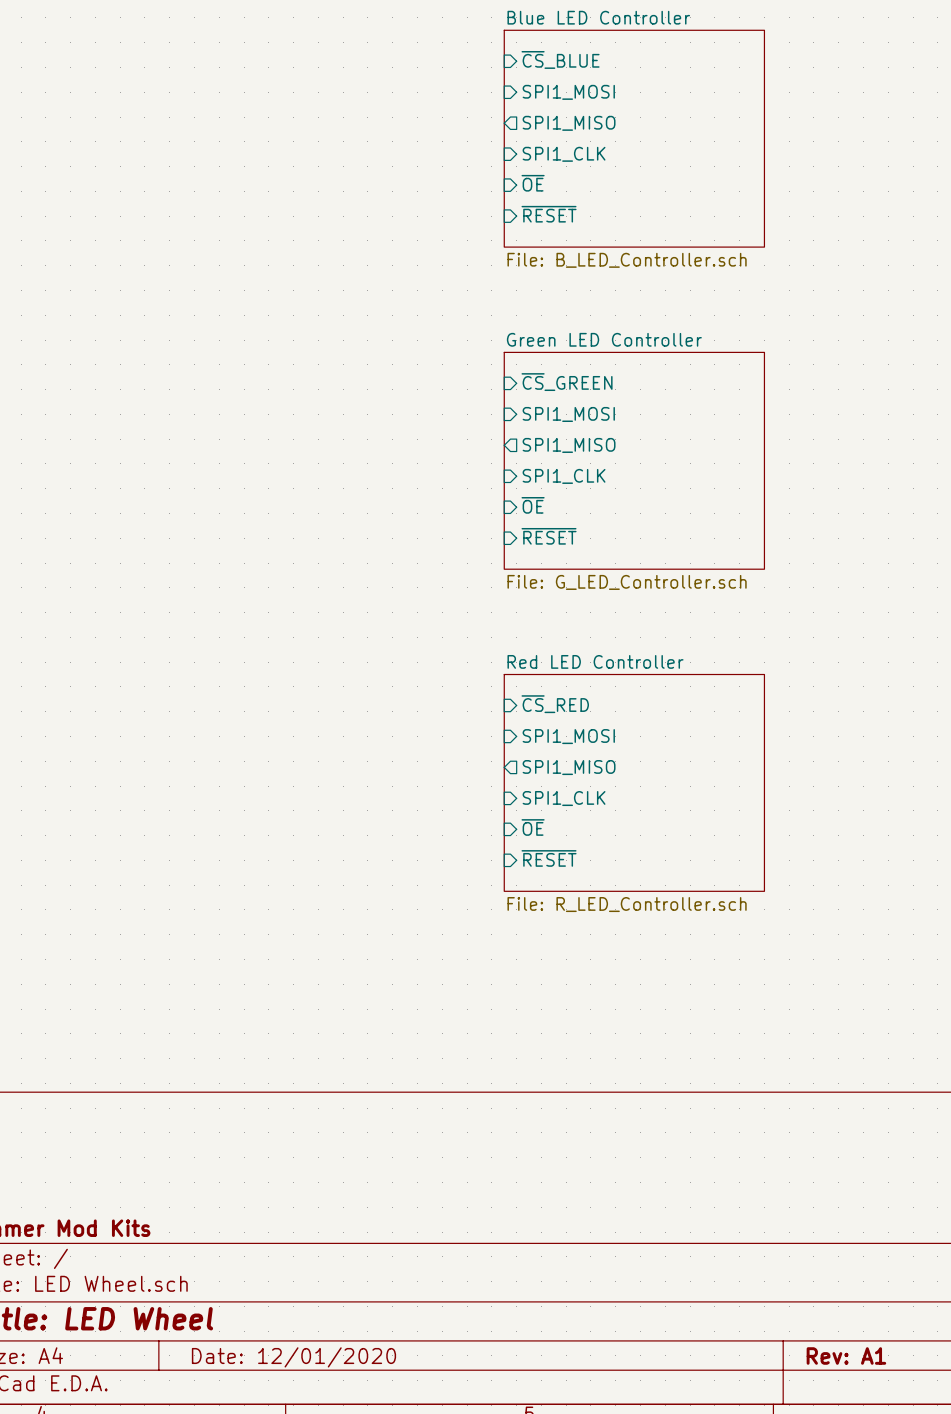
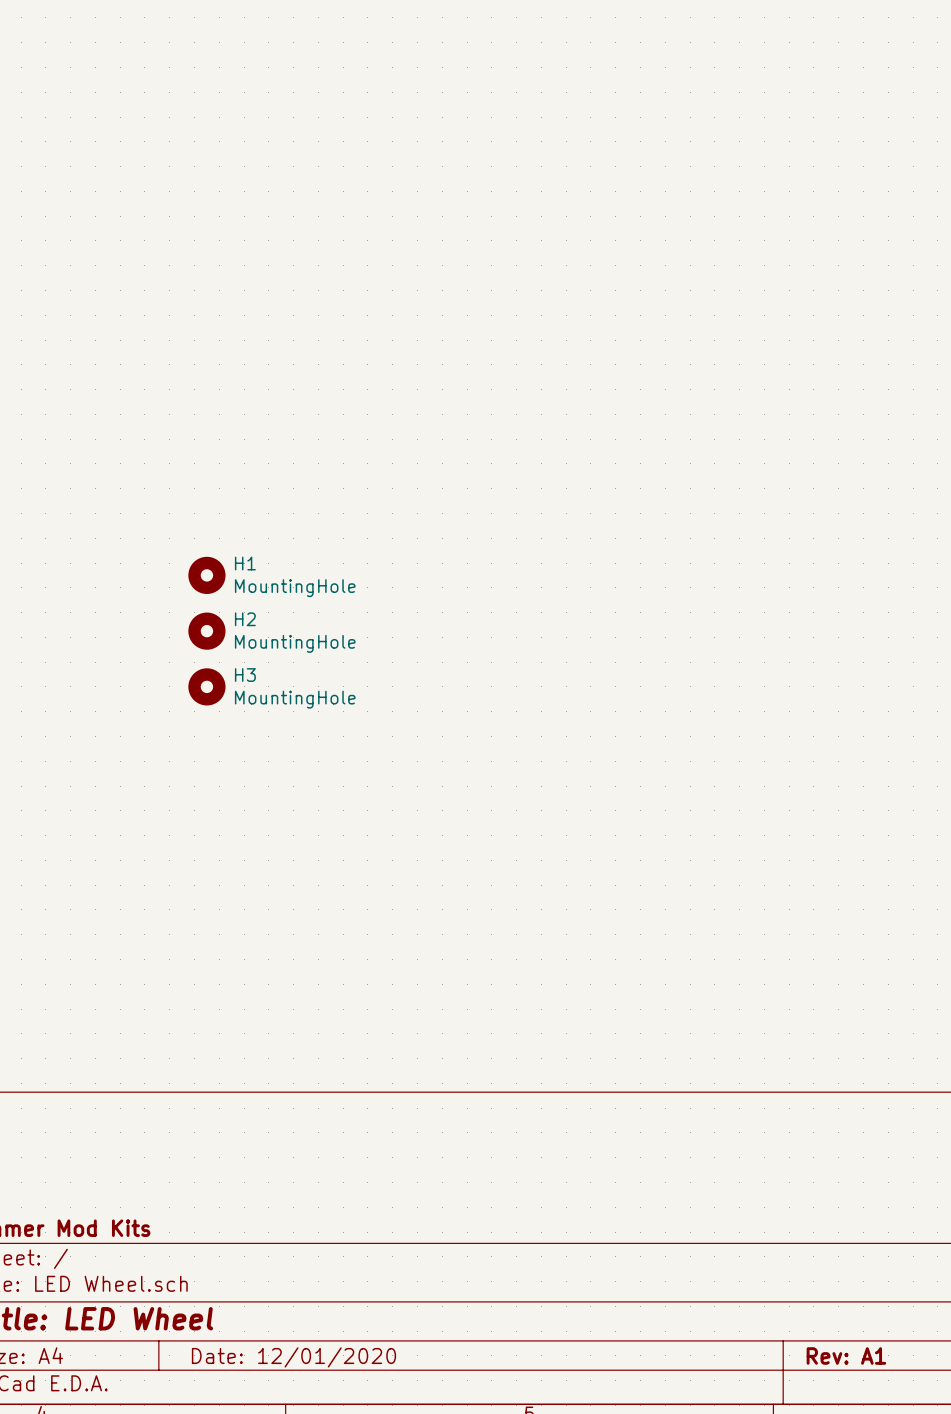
sheet pin: ~{CS}_BLUE (560, 59) -> none
sheet pin: SPI1_MOSI (568, 92) -> none
sheet pin: SPI1_MISO (569, 123) -> none
sheet Blue LED Controller: File: B_LED_Controller.sch (634, 138) -> none
sheet pin: SPI1_CLK (564, 154) -> none
sheet pin: ~{OE} (533, 183) -> none
sheet pin: ~{RESET} (549, 214) -> none
sheet pin: ~{CS}_GREEN (567, 382) -> none
sheet pin: SPI1_MOSI (568, 414) -> none
sheet pin: SPI1_MISO (569, 445) -> none
sheet Green LED Controller: File: G_LED_Controller.sch (634, 460) -> none
sheet pin: SPI1_CLK (564, 476) -> none
sheet pin: ~{OE} (533, 505) -> none
sheet pin: ~{RESET} (549, 536) -> none
H1: none -> MountingHole (206, 575)
H2: none -> MountingHole (206, 631)
H3: none -> MountingHole (206, 686)
sheet pin: ~{CS}_RED (555, 704) -> none
sheet pin: SPI1_MOSI (568, 736) -> none
sheet pin: SPI1_MISO (569, 767) -> none
sheet Red LED Controller: File: R_LED_Controller.sch (634, 782) -> none
sheet pin: SPI1_CLK (564, 798) -> none
sheet pin: ~{OE} (533, 827) -> none
sheet pin: ~{RESET} (549, 858) -> none

